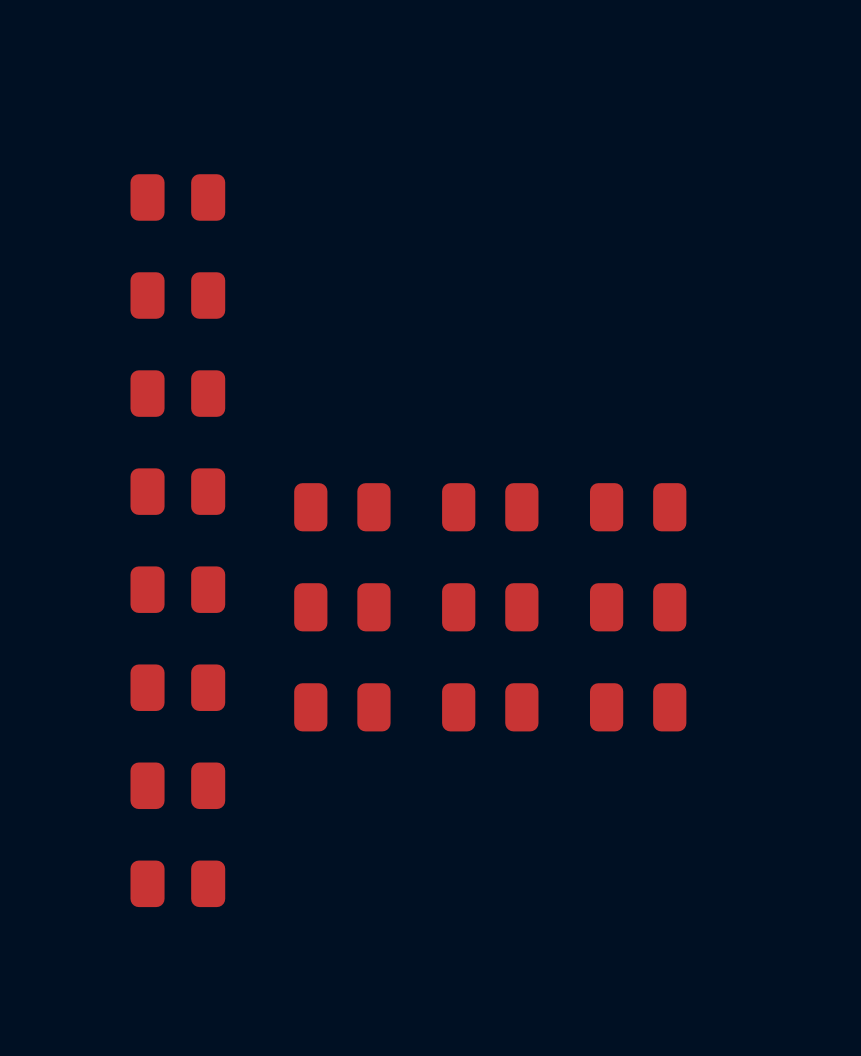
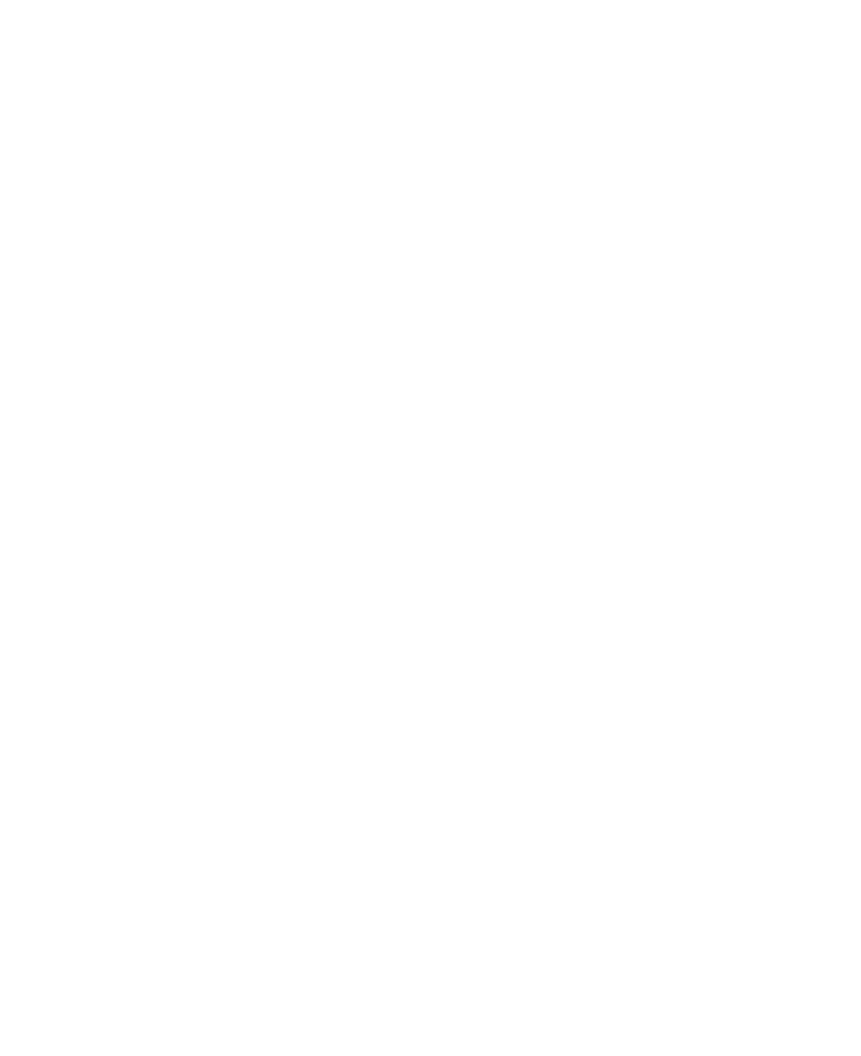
part: (177, 197) -> none
part: (177, 295) -> none
part: (177, 393) -> none
part: (177, 491) -> none
part: (342, 507) -> none
part: (490, 507) -> none
part: (638, 507) -> none
part: (177, 589) -> none
part: (342, 607) -> none
part: (490, 607) -> none
part: (638, 607) -> none
part: (177, 687) -> none
part: (342, 707) -> none
part: (490, 707) -> none
part: (638, 707) -> none
part: (177, 785) -> none
part: (177, 883) -> none

